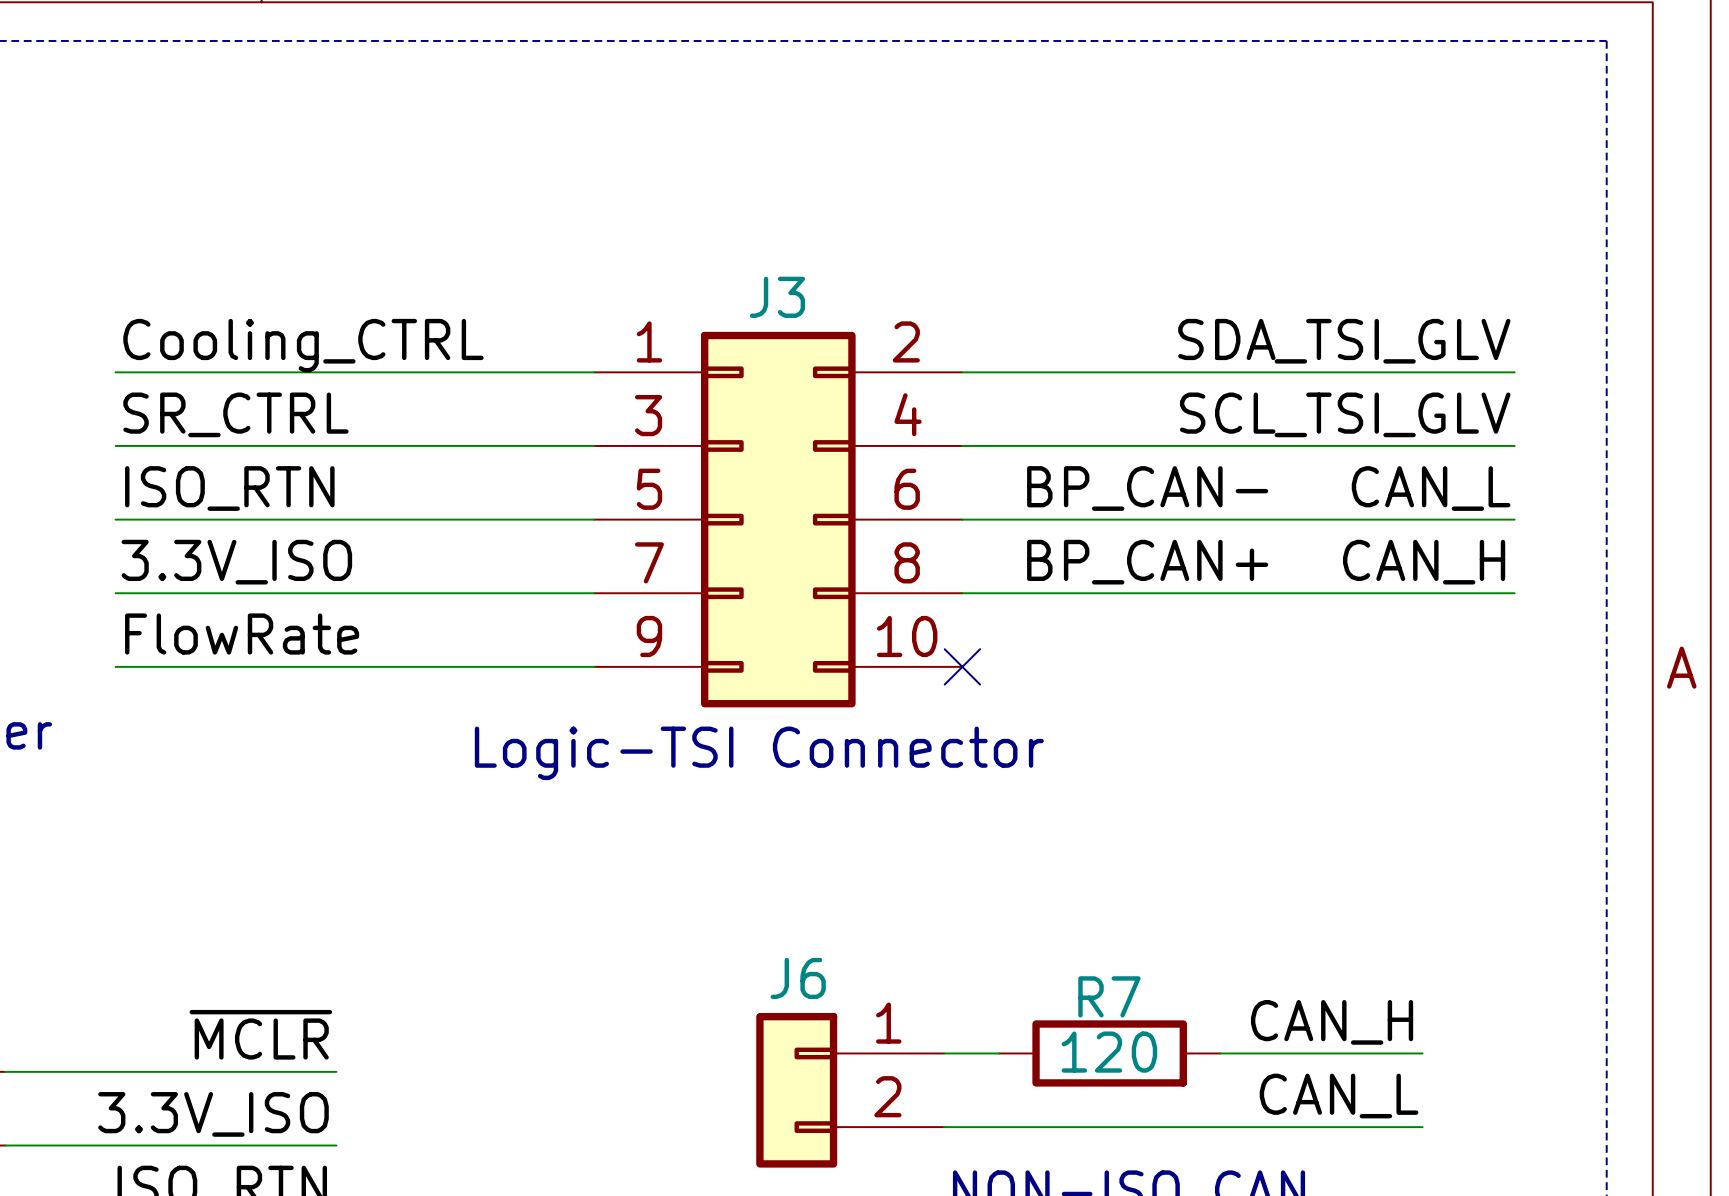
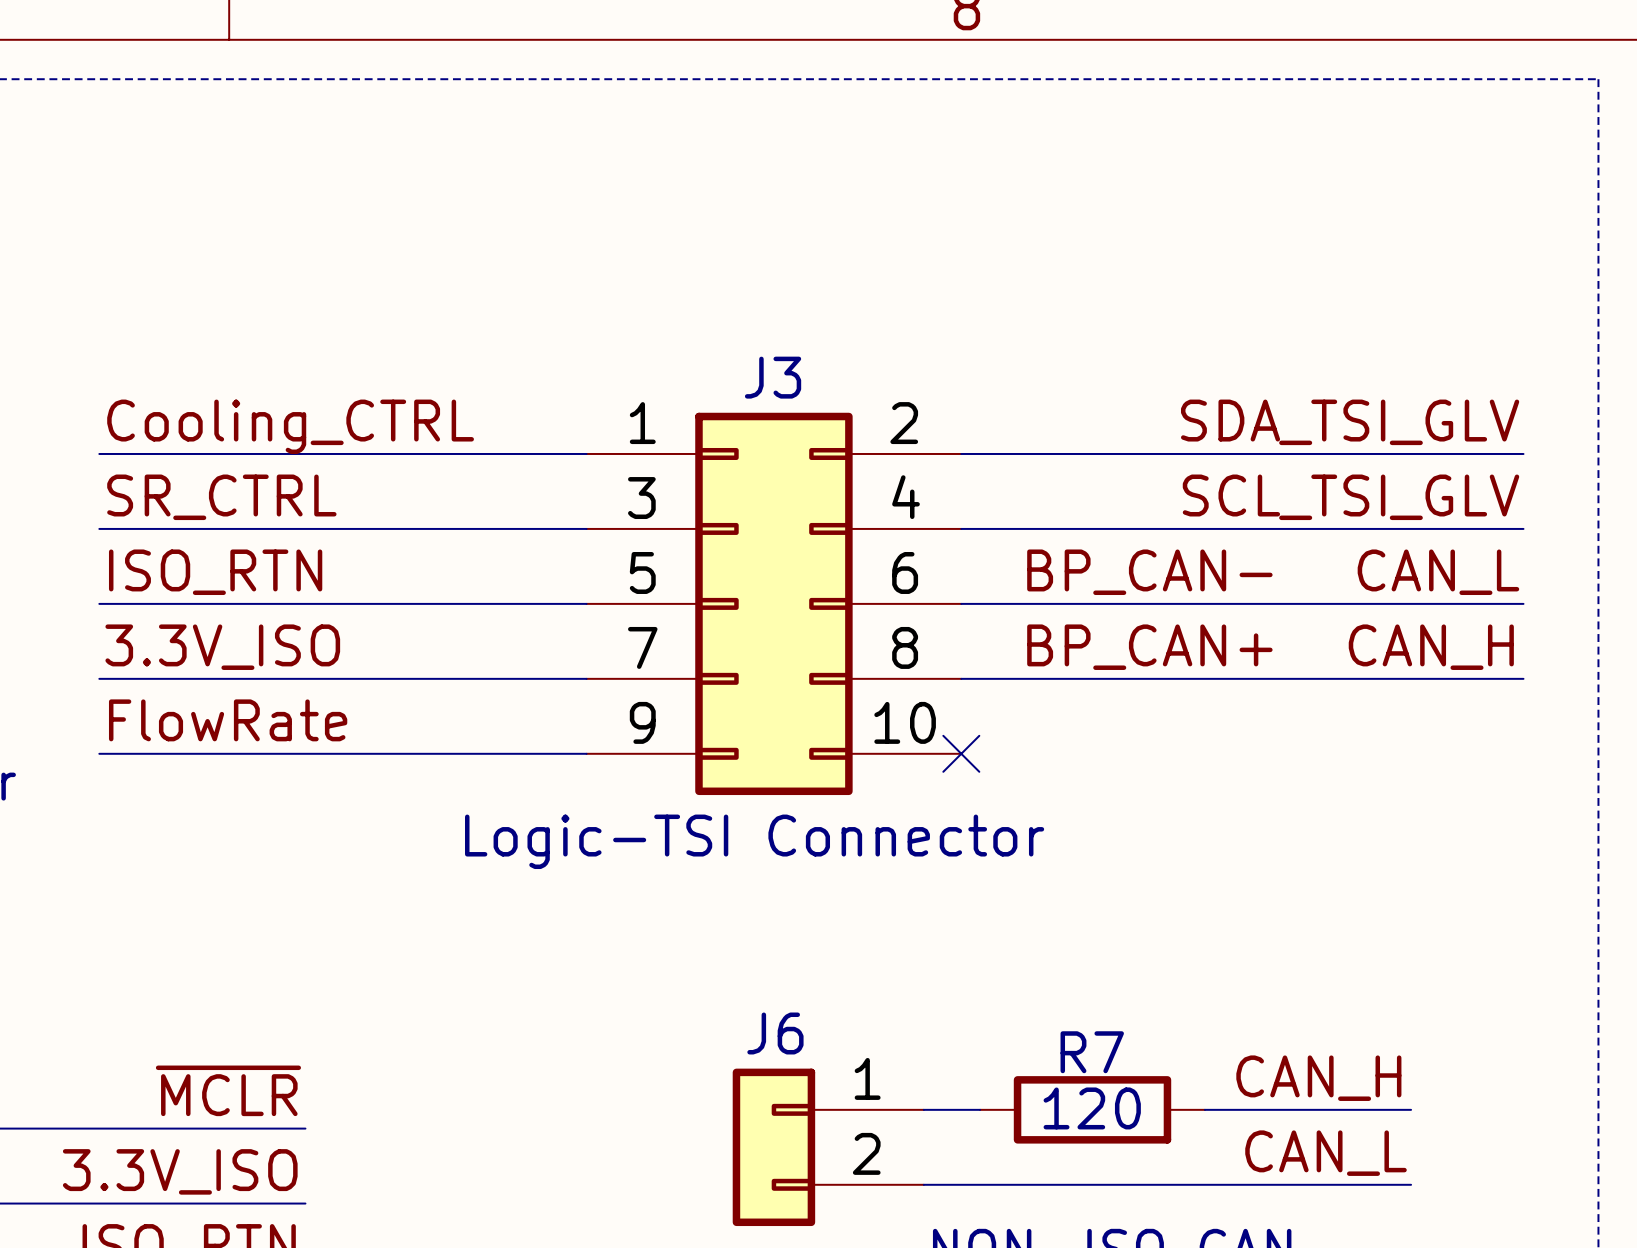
label position: SDA_TSI_GLV (1344, 341) -> SDA_TSI_GLV (1350, 422)
label position: Cooling_CTRL (303, 345) -> Cooling_CTRL (290, 426)
wire: (115, 372) (594, 372) -> (99, 453) (586, 453)
wire: (962, 372) (1514, 372) -> (961, 453) (1523, 453)
label position: SR_CTRL (235, 414) -> SR_CTRL (221, 497)
label position: SCL_TSI_GLV (1345, 414) -> SCL_TSI_GLV (1350, 497)
wire: (115, 445) (594, 445) -> (99, 528) (586, 528)
wire: (962, 445) (1514, 445) -> (961, 528) (1523, 528)
label position: ISO_RTN (229, 488) -> ISO_RTN (215, 572)
label position: BP_CAN- (1147, 488) -> BP_CAN- (1149, 572)
label position: CAN_L (1431, 488) -> CAN_L (1438, 572)
wire: (115, 519) (594, 519) -> (99, 603) (586, 603)
J3 position: (778, 519) -> (773, 603)
wire: (962, 519) (1514, 519) -> (961, 603) (1523, 603)
label position: 3.3V_ISO (236, 562) -> 3.3V_ISO (222, 647)
label position: BP_CAN+ (1147, 562) -> BP_CAN+ (1149, 647)
label position: CAN_H (1424, 562) -> CAN_H (1431, 647)
wire: (115, 593) (594, 593) -> (99, 678) (586, 678)
wire: (962, 593) (1514, 593) -> (961, 678) (1523, 678)
label position: FlowRate (242, 634) -> FlowRate (228, 720)
wire: (115, 666) (594, 666) -> (99, 753) (586, 753)
no-connect mark position: (962, 666) -> (961, 753)
text position: Logic-TSI Connector (759, 753) -> Logic-TSI Connector (754, 841)

